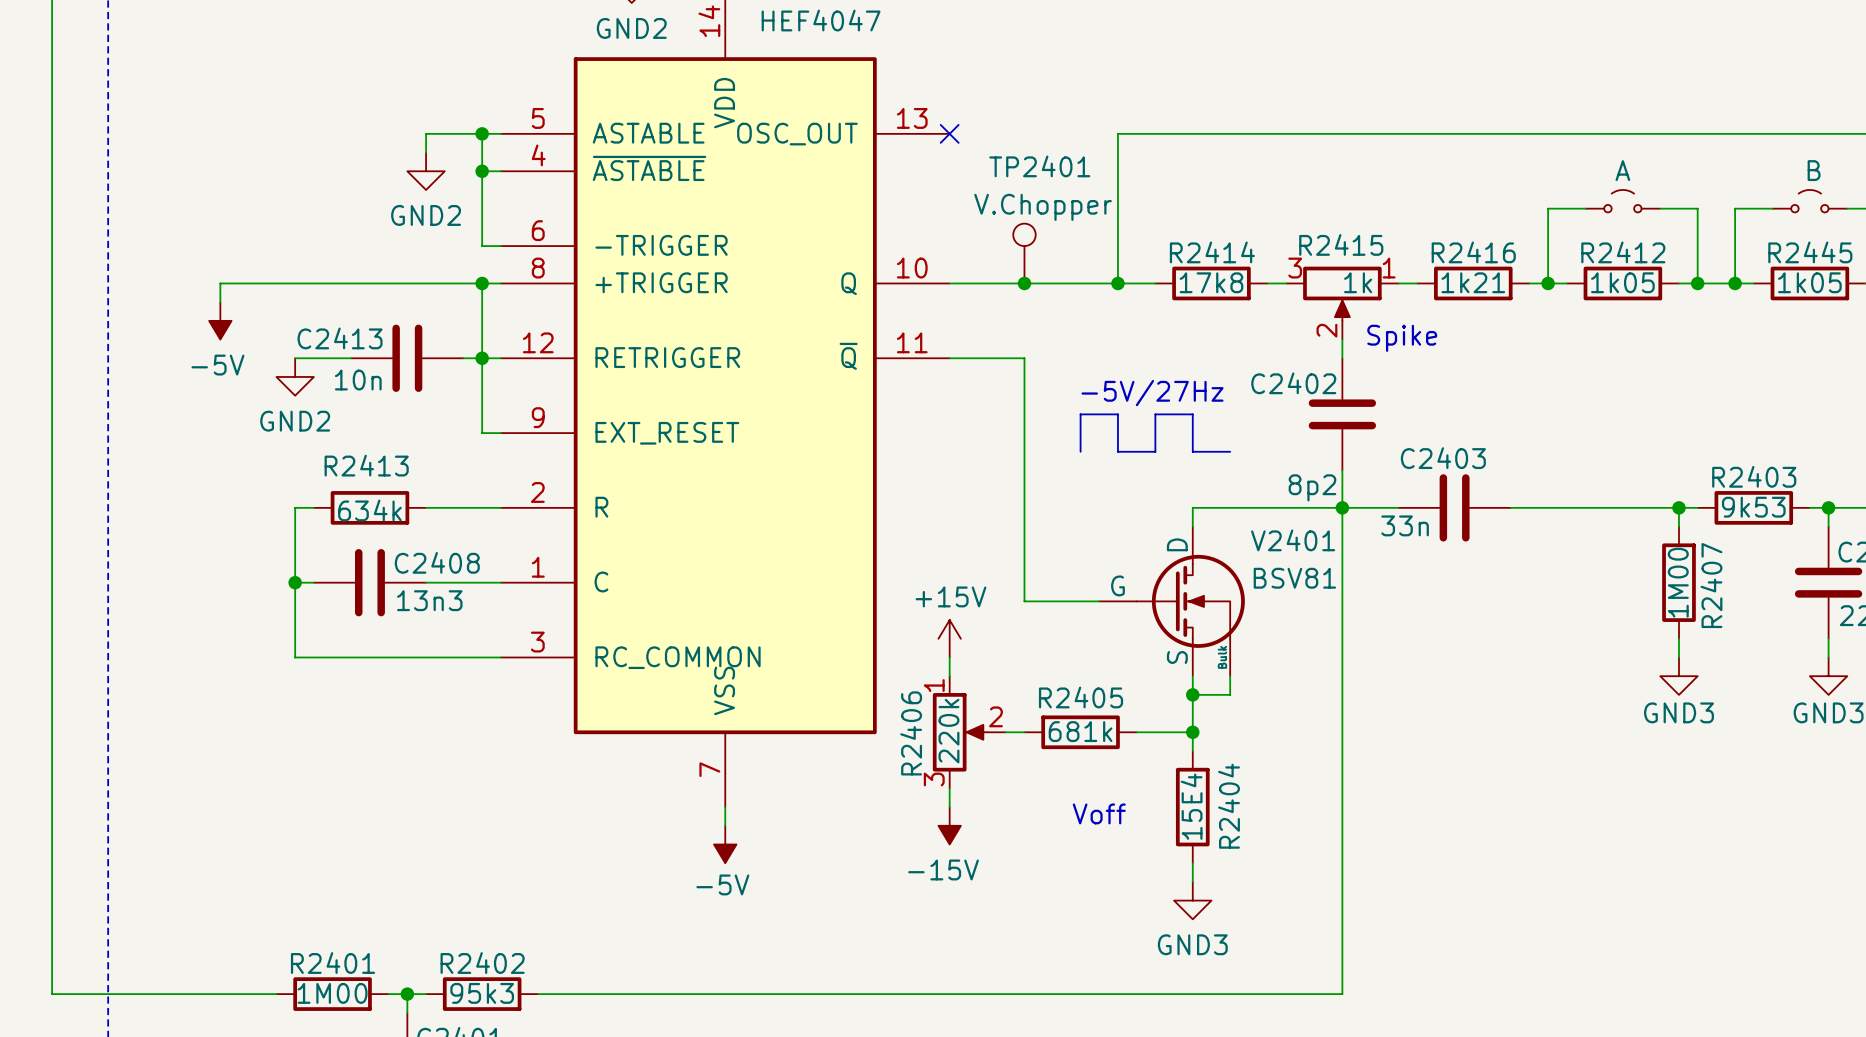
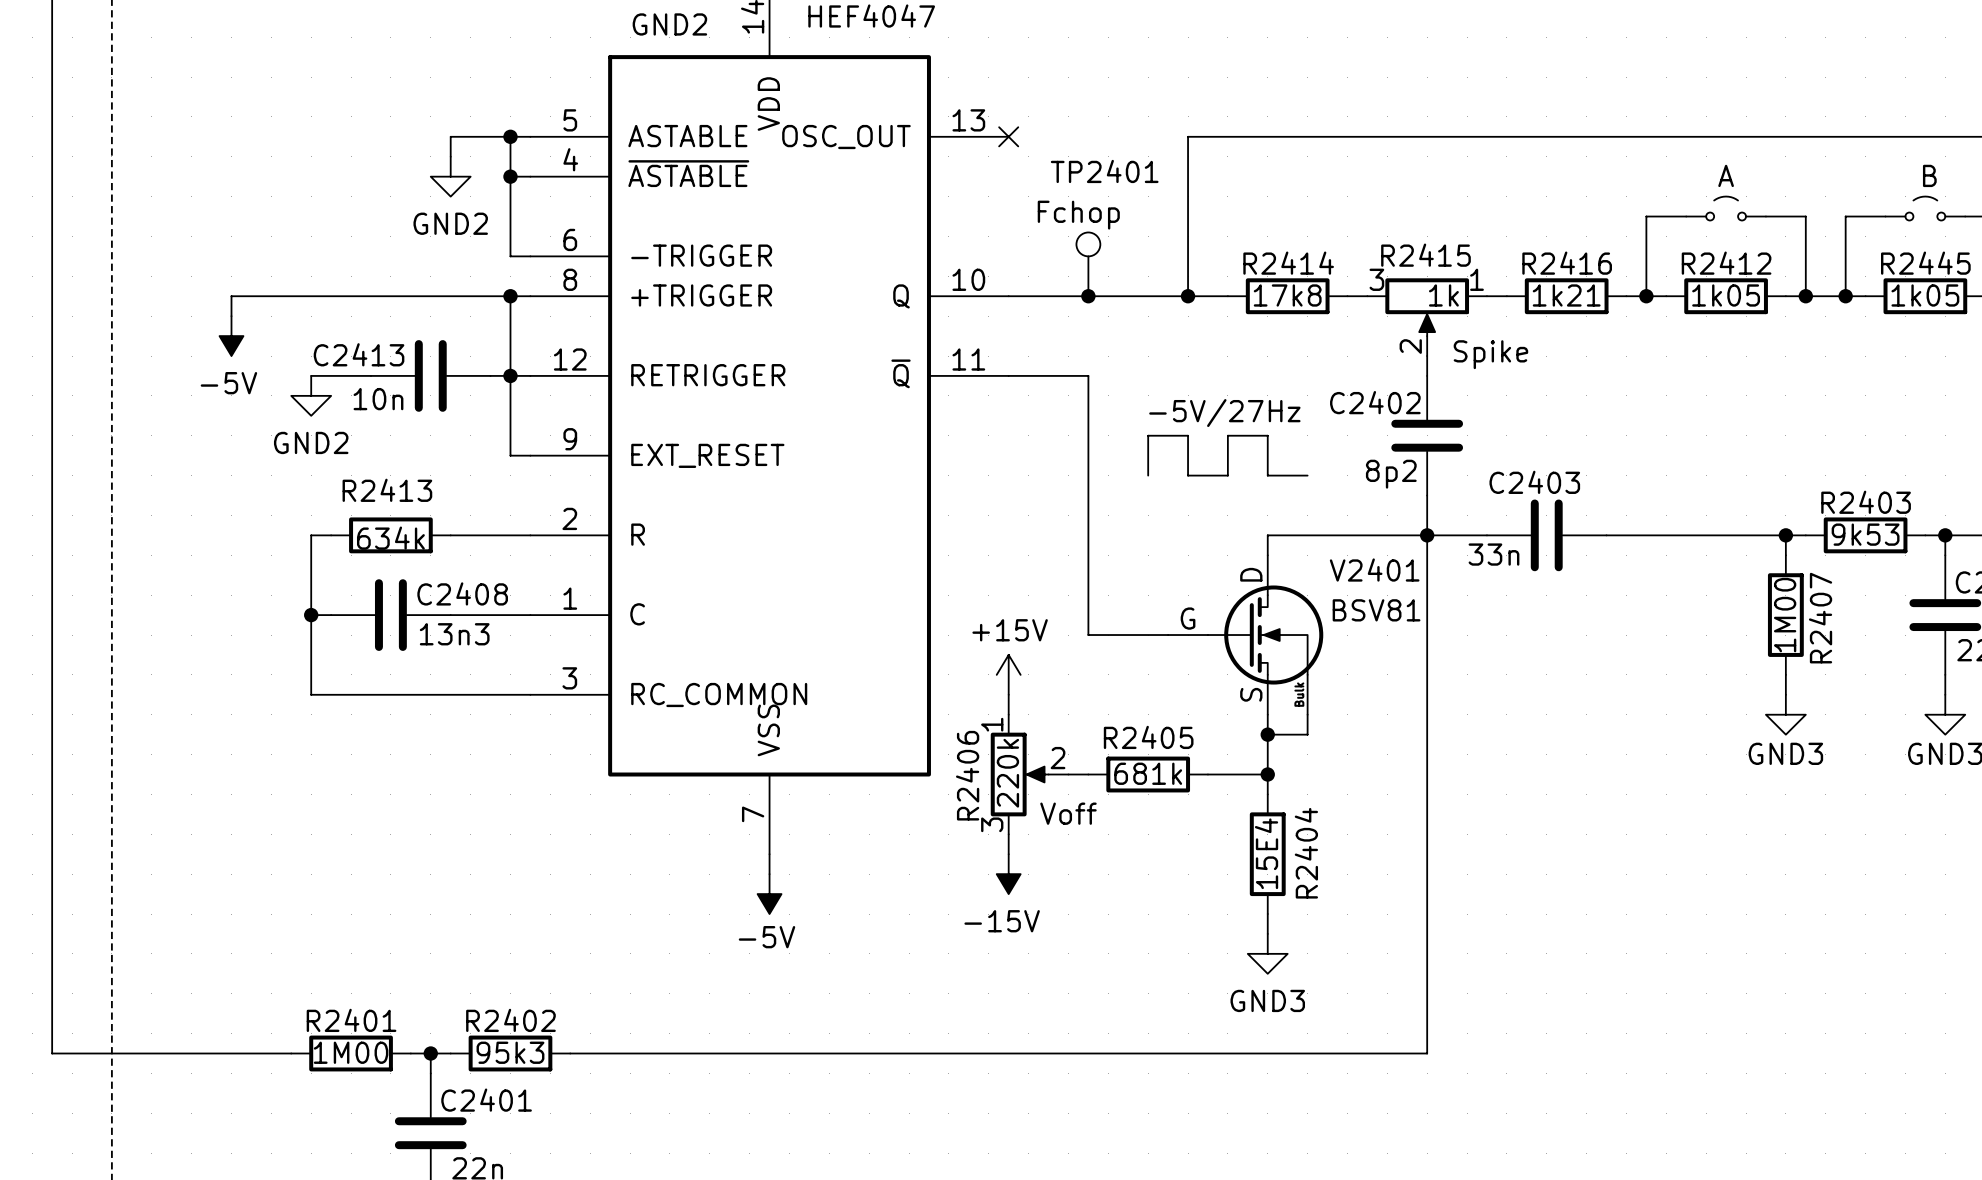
TP2401 value: V.Chopper (1043, 207) -> Fchop (1078, 215)
C2402 value position: 8p2 (1312, 487) -> 8p2 (1391, 474)
text position: Voff (1099, 813) -> Voff (1068, 813)

